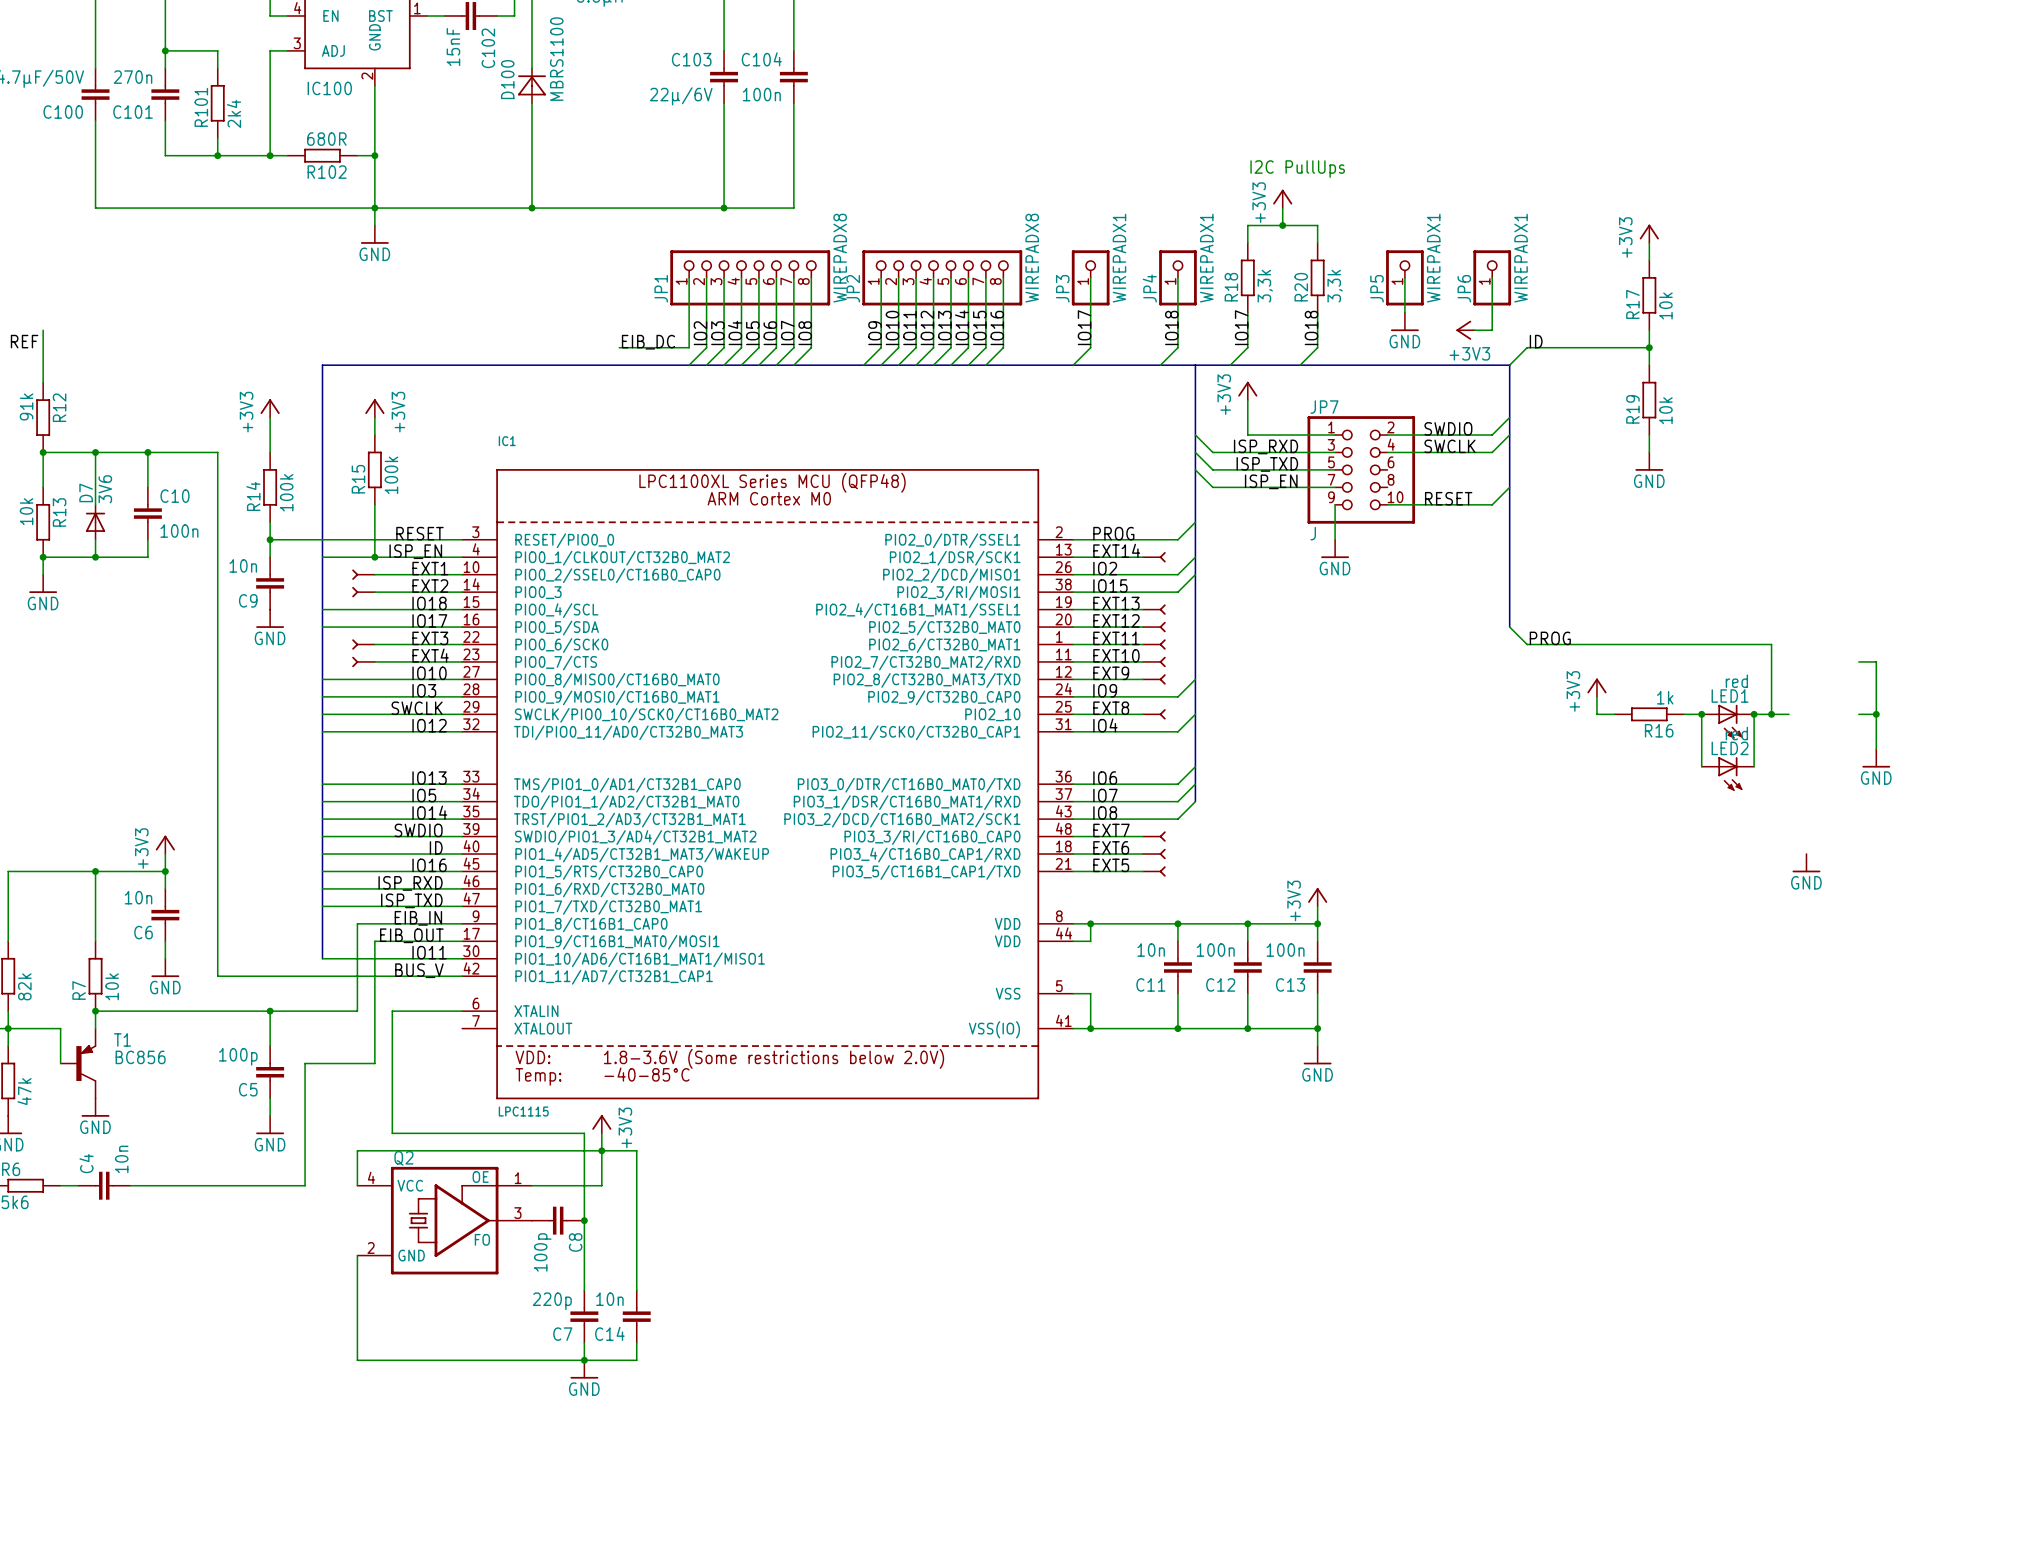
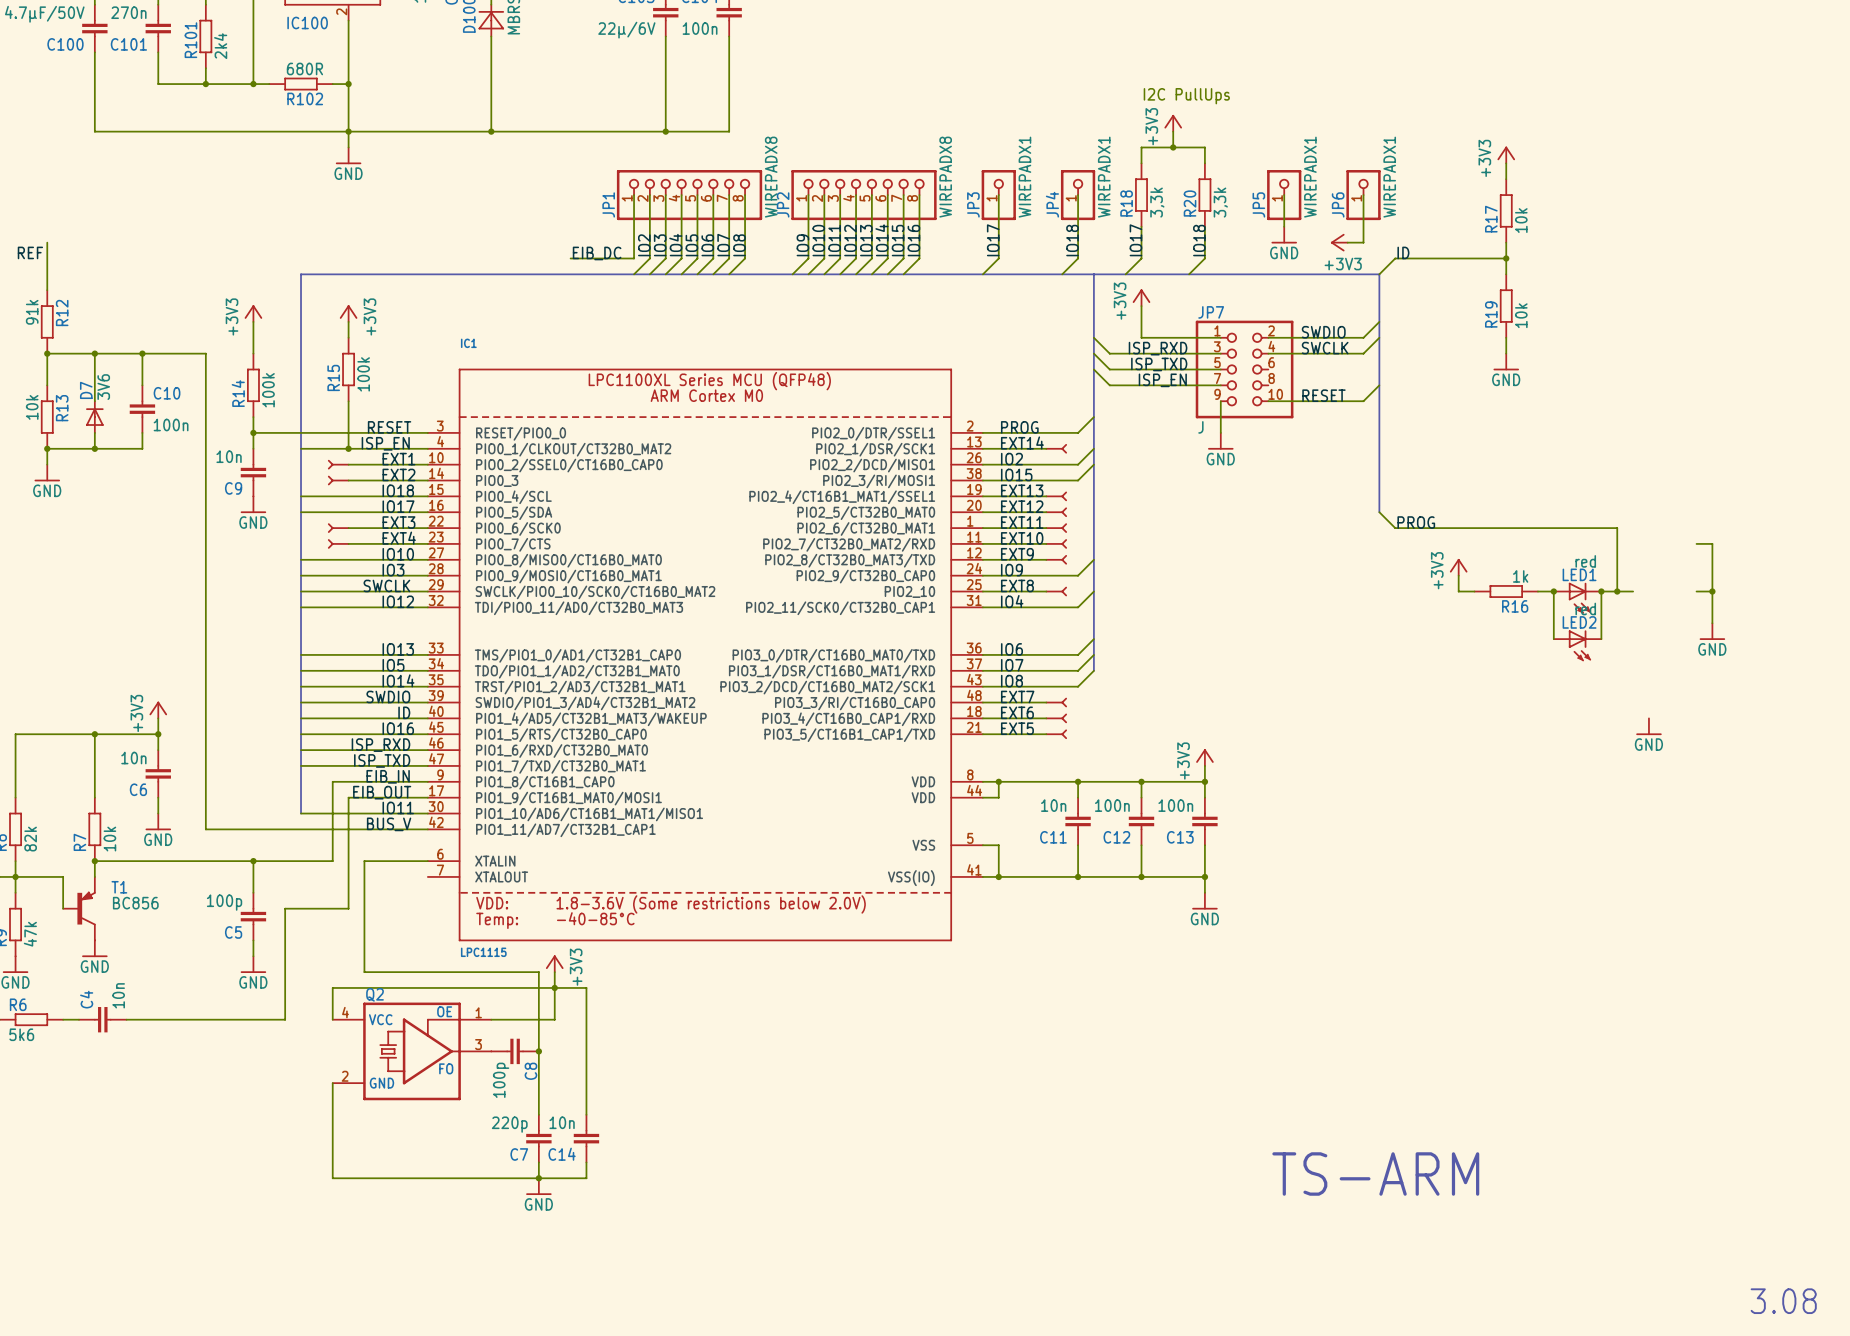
text: none -> TS-ARM (1375, 1174)
text: none -> 3.08 (1783, 1301)

